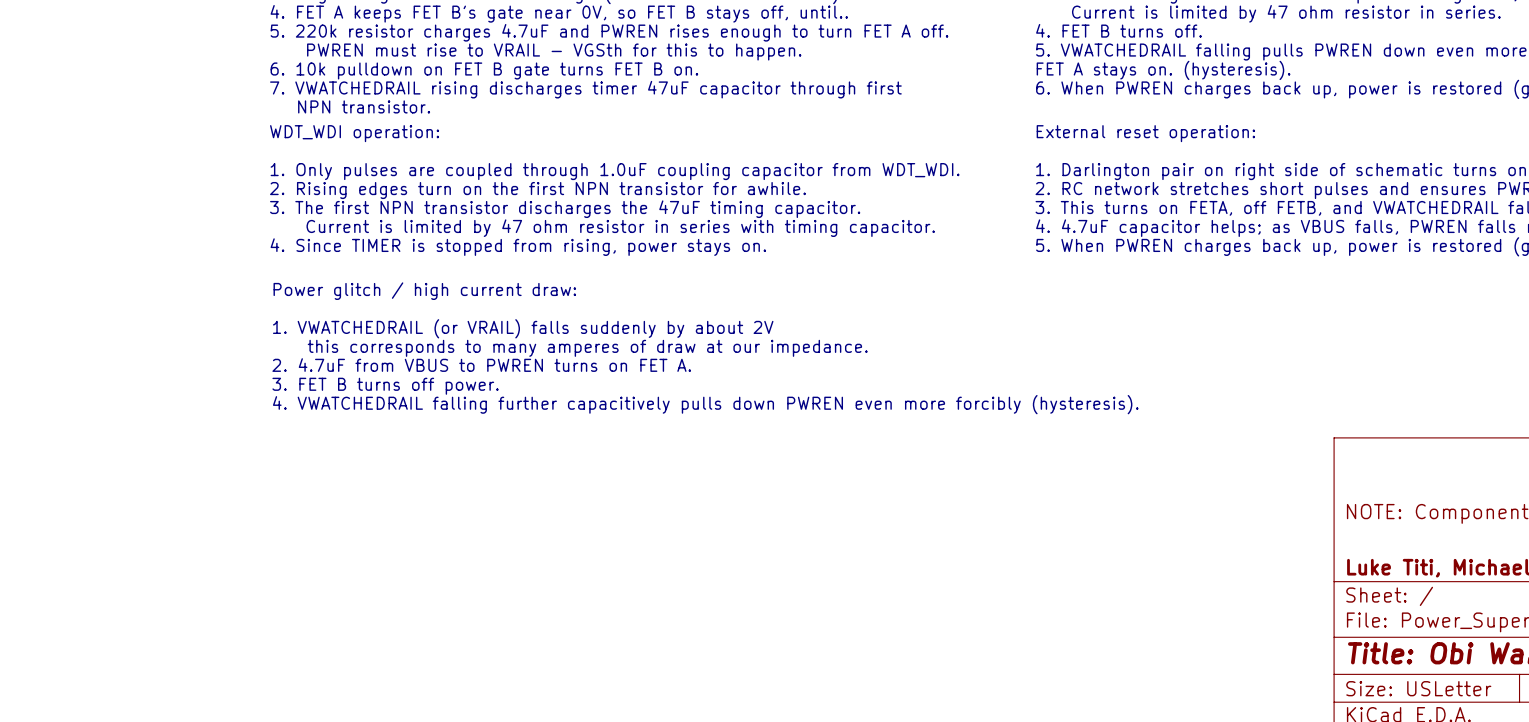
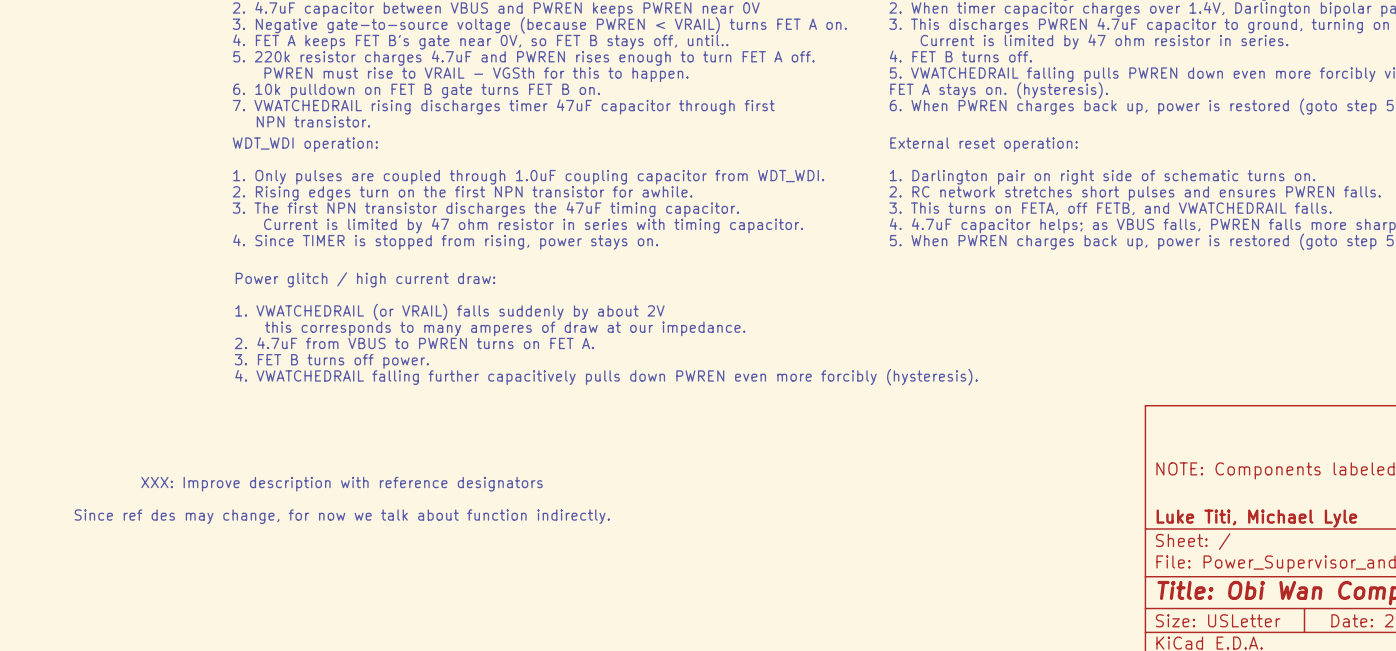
text: none -> XXX: Improve description with reference designators (342, 484)
text: none -> Since ref des may change, for now we talk about function indirectly. (342, 516)

